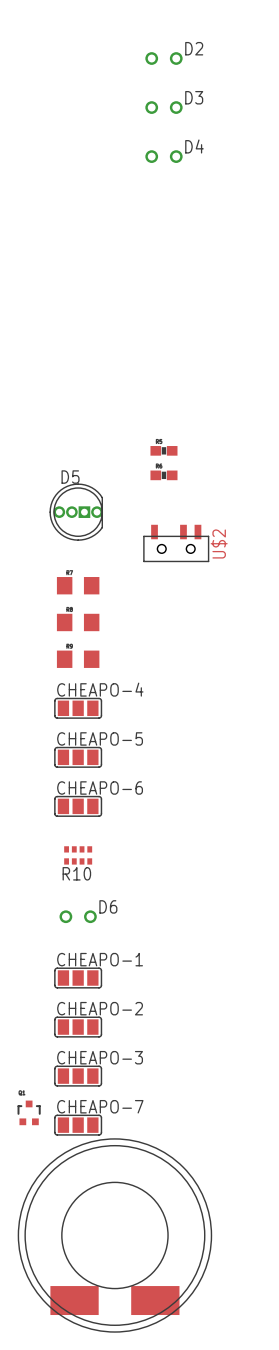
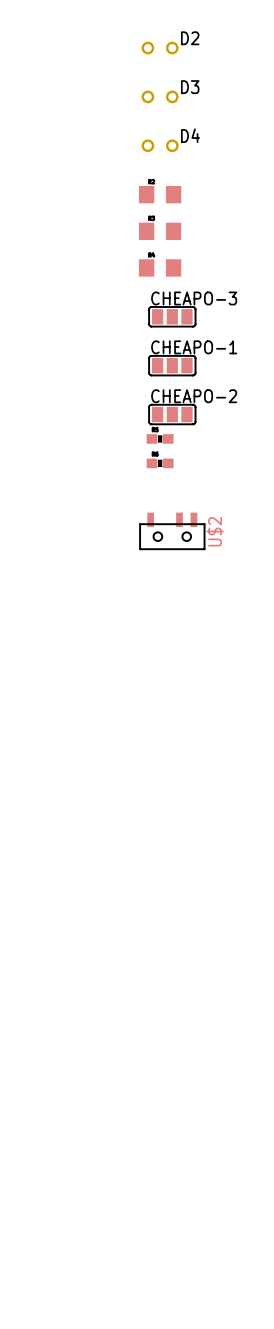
part: none -> (160, 194)
part: none -> (160, 231)
part: none -> (160, 267)
D5: (76, 512) -> none
part: (78, 585) -> none
part: (78, 622) -> none
part: (78, 659) -> none
CHEAPO-4: (78, 708) -> none
CHEAPO-5: (78, 757) -> none
CHEAPO-6: (78, 806) -> none
R10: (78, 855) -> none
D6: (78, 916) -> none
CHEAPO-1 position: (78, 978) -> (172, 365)
CHEAPO-2 position: (78, 1027) -> (172, 414)
CHEAPO-3 position: (78, 1076) -> (172, 316)
part: (29, 1112) -> none
CHEAPO-7: (78, 1125) -> none
part: (114, 1235) -> none

